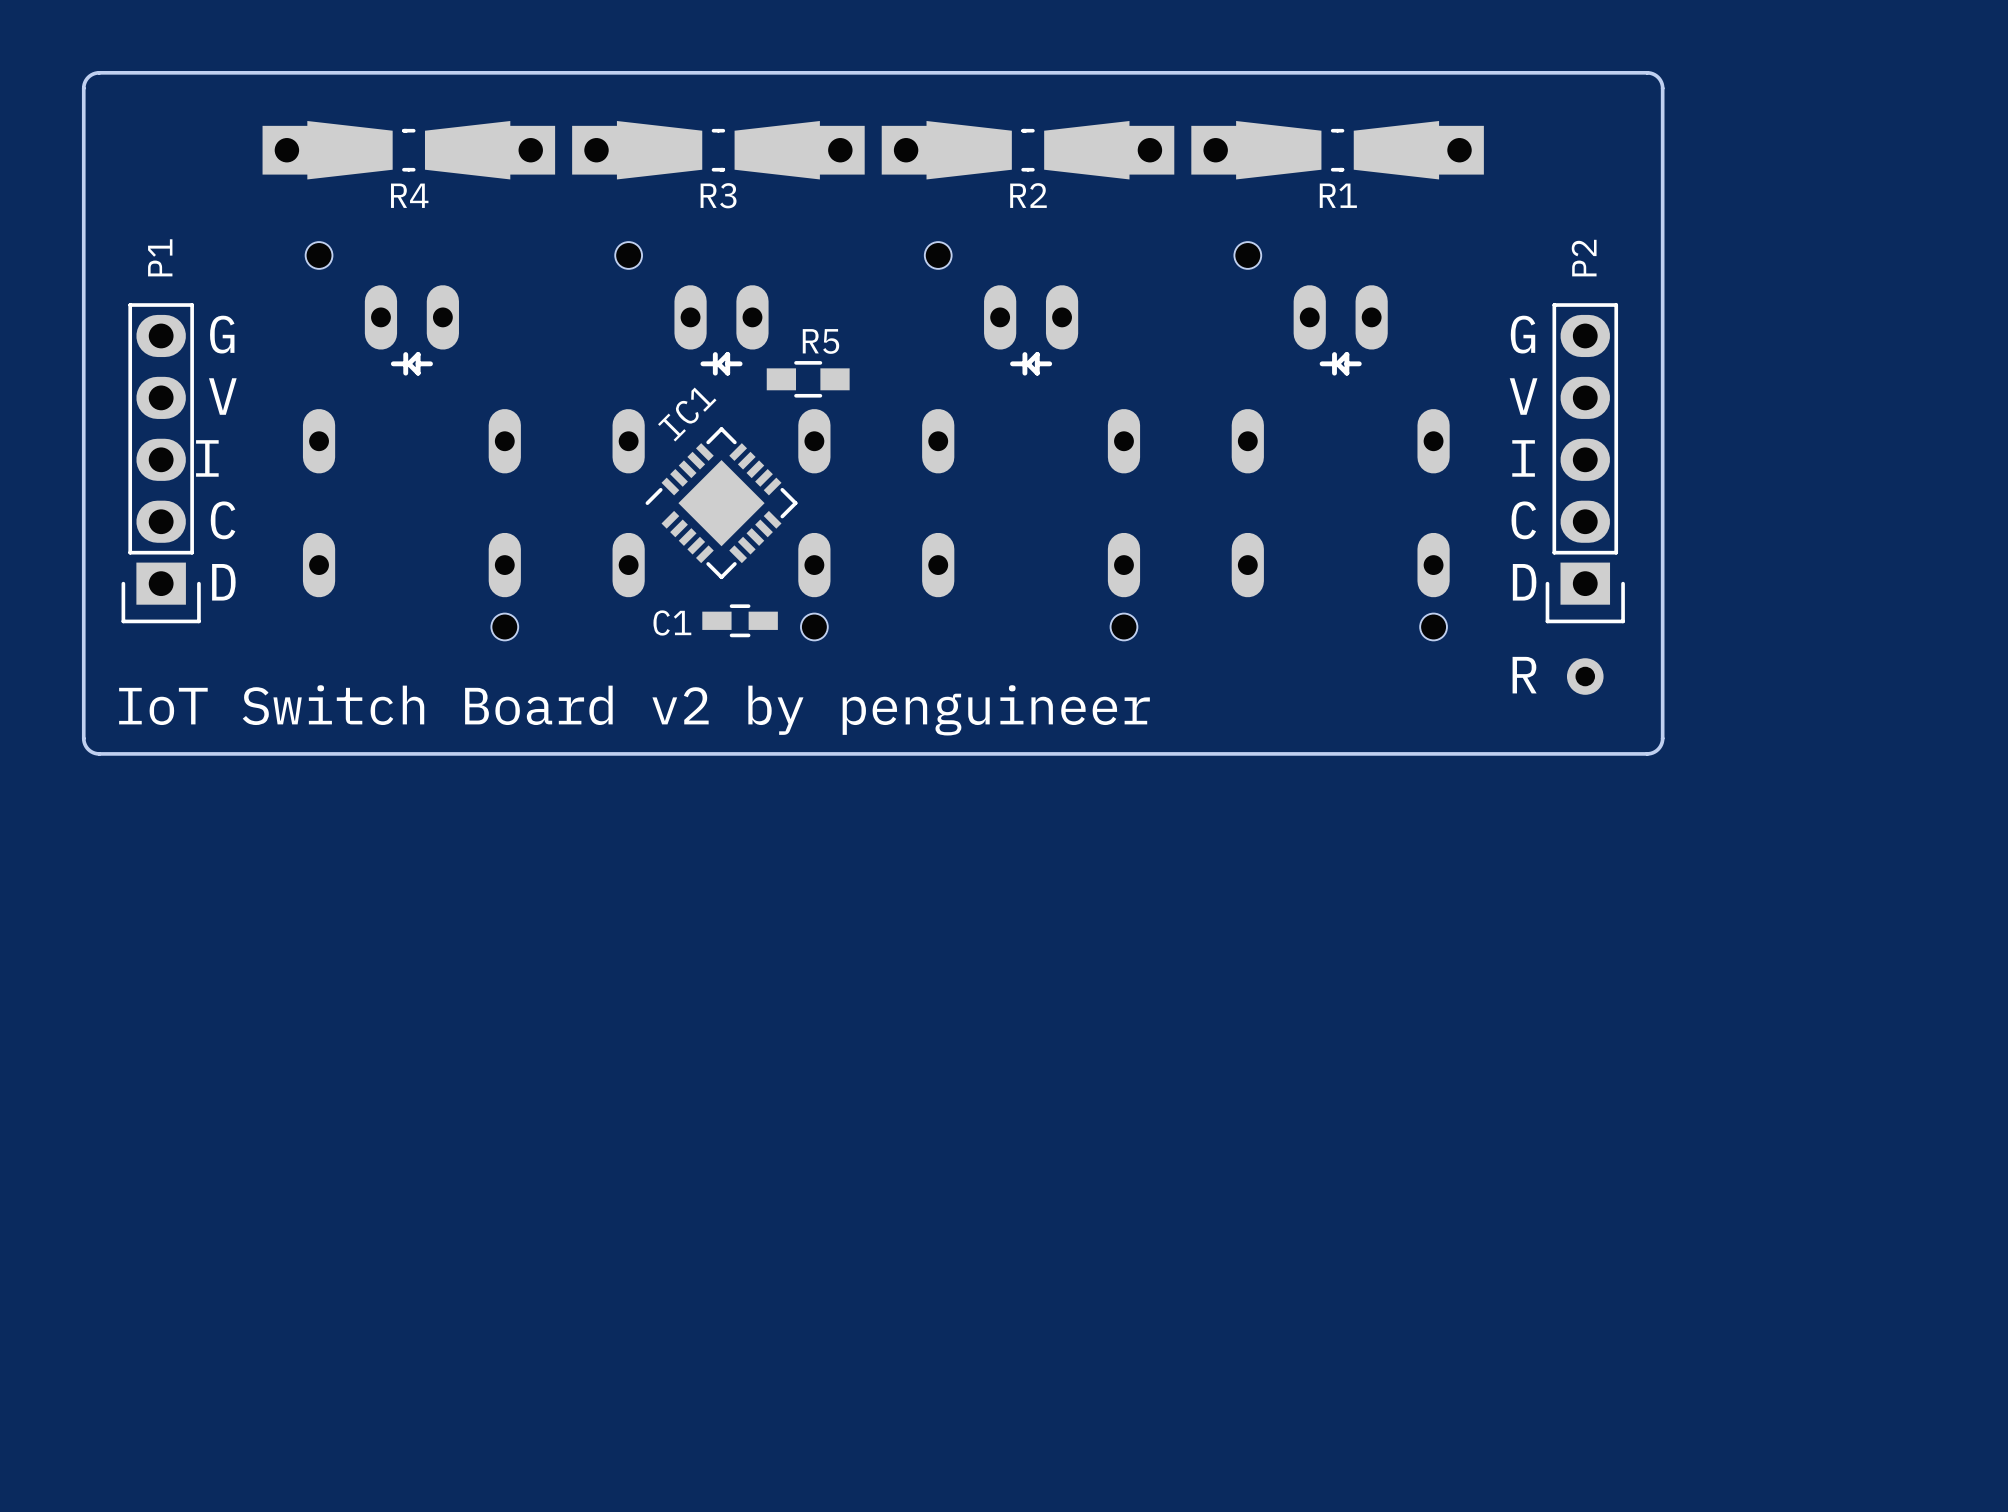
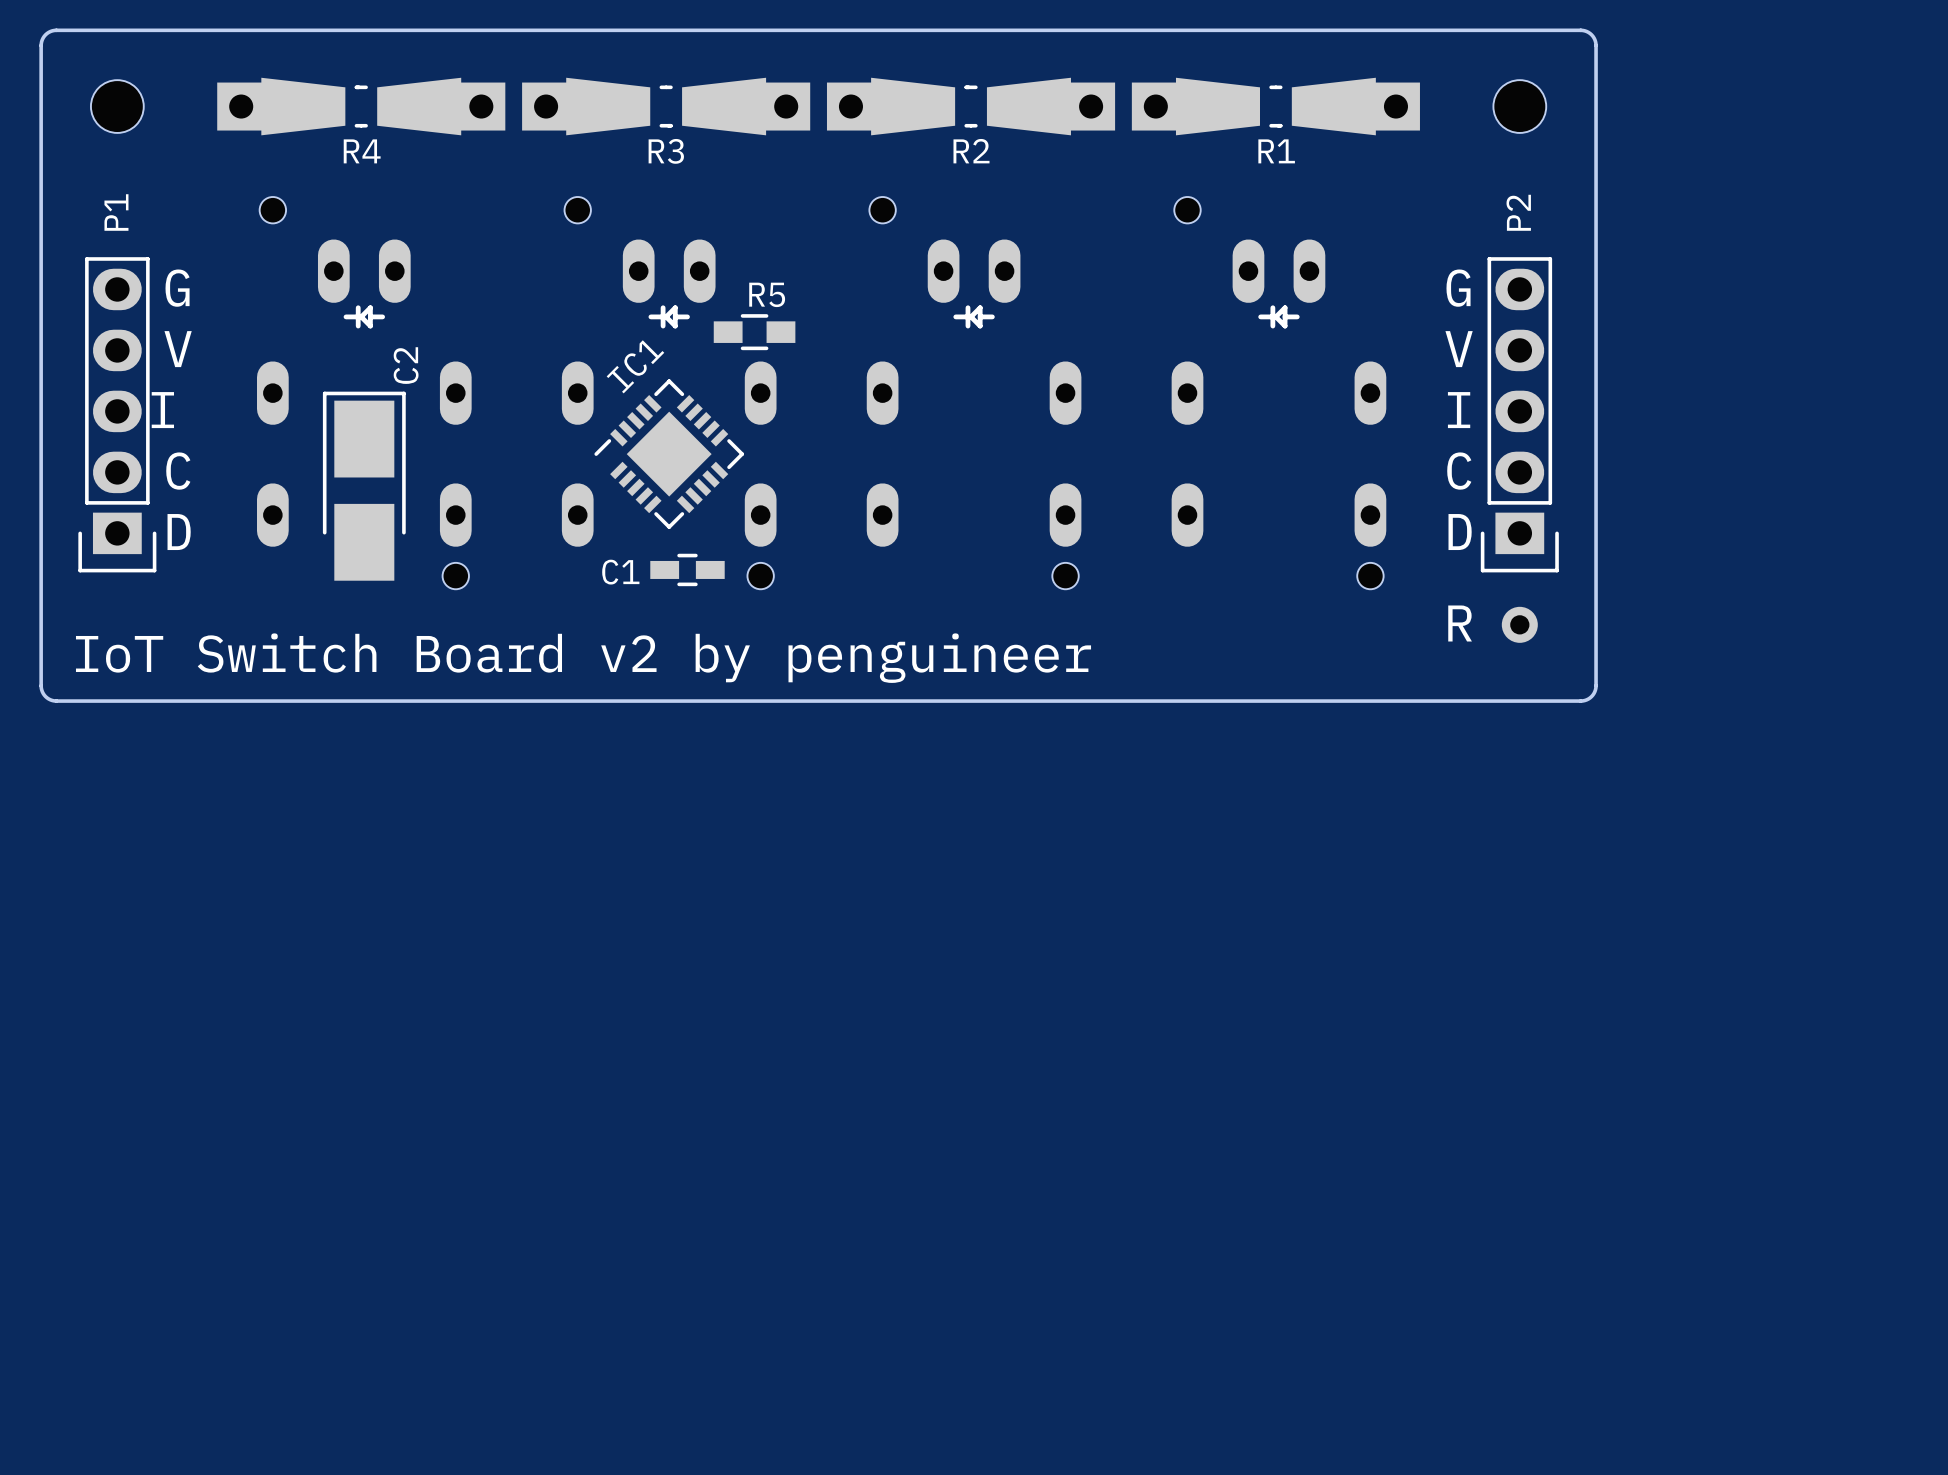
part: none -> (117, 106)
part: none -> (1519, 106)
C2: none -> (364, 486)

